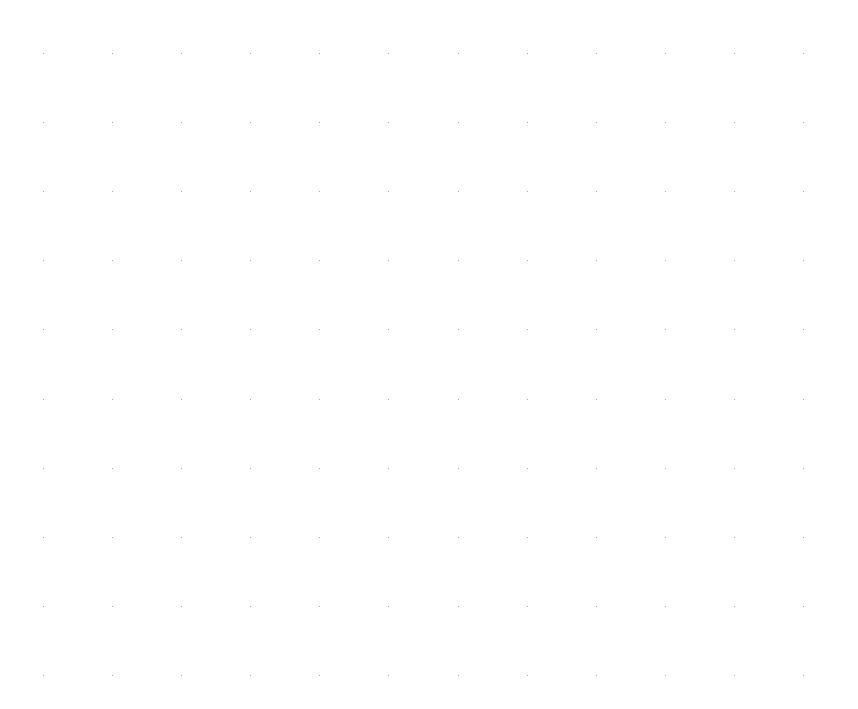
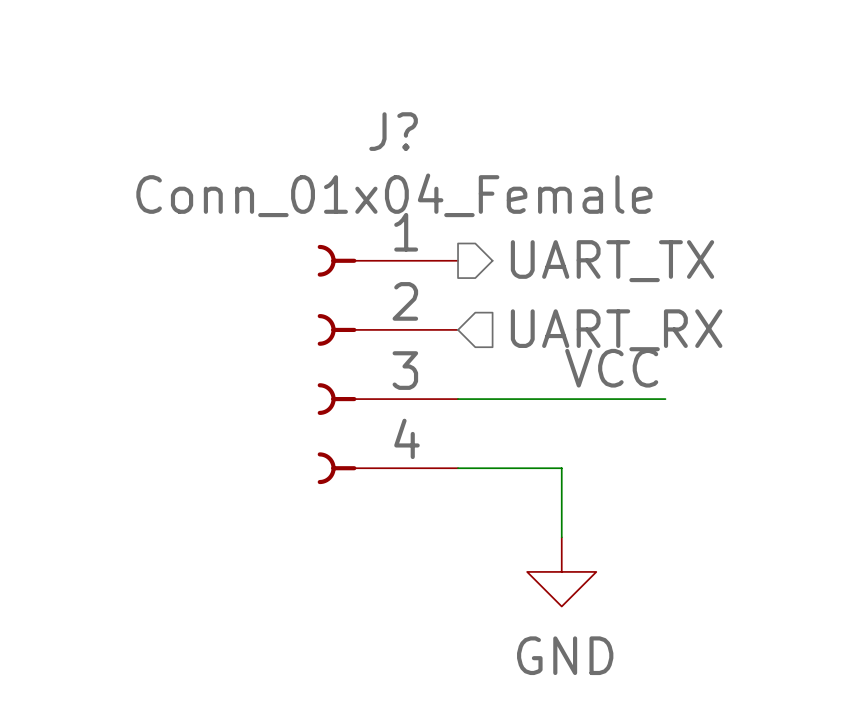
hierarchical label: none -> UART_TX (612, 261)
hierarchical label: none -> UART_RX (616, 330)
J?: none -> Conn_01x04_Female (387, 364)
label: none -> VCC (611, 368)
wire: none -> (458, 399) (665, 399)
wire: none -> (458, 468) (561, 468) (561, 537)
power symbol: none -> GND (561, 571)

